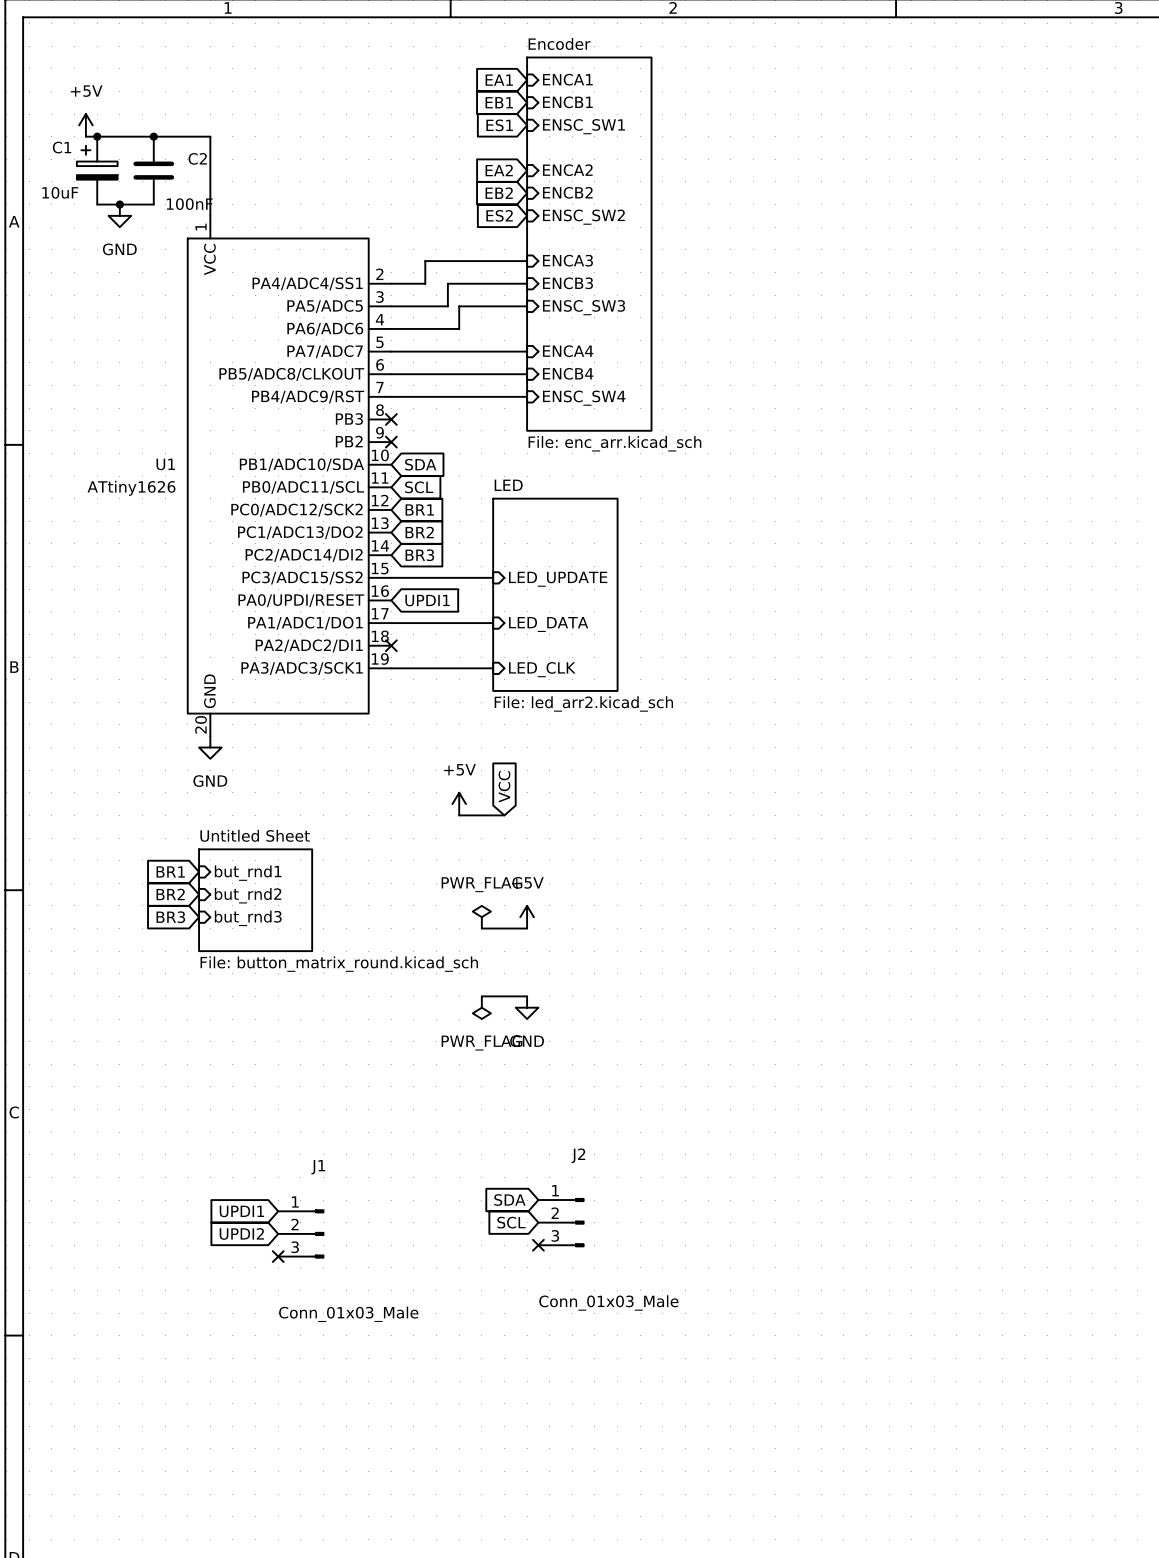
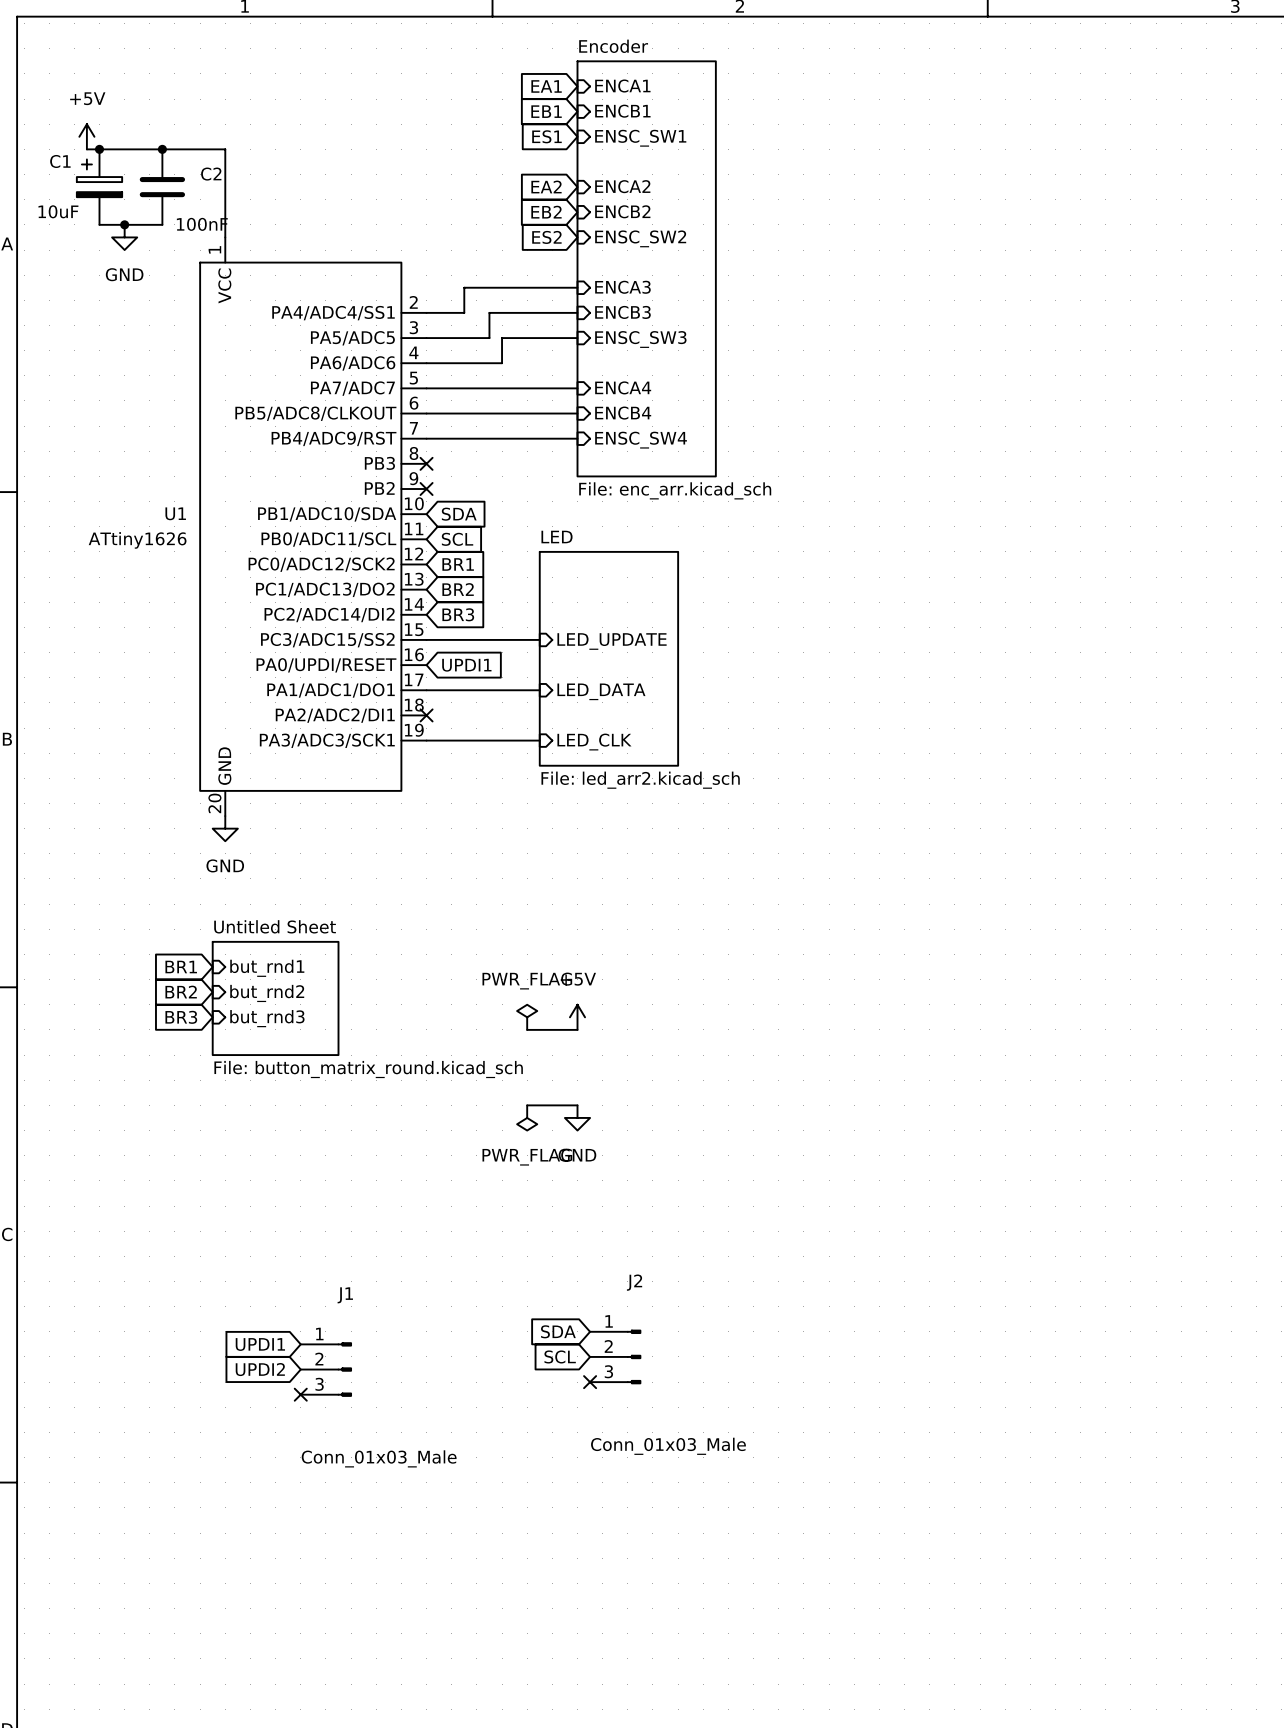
global label: VCC (504, 786) -> none
power symbol: +5V (459, 804) -> none
wire: (459, 815) (504, 815) -> none

